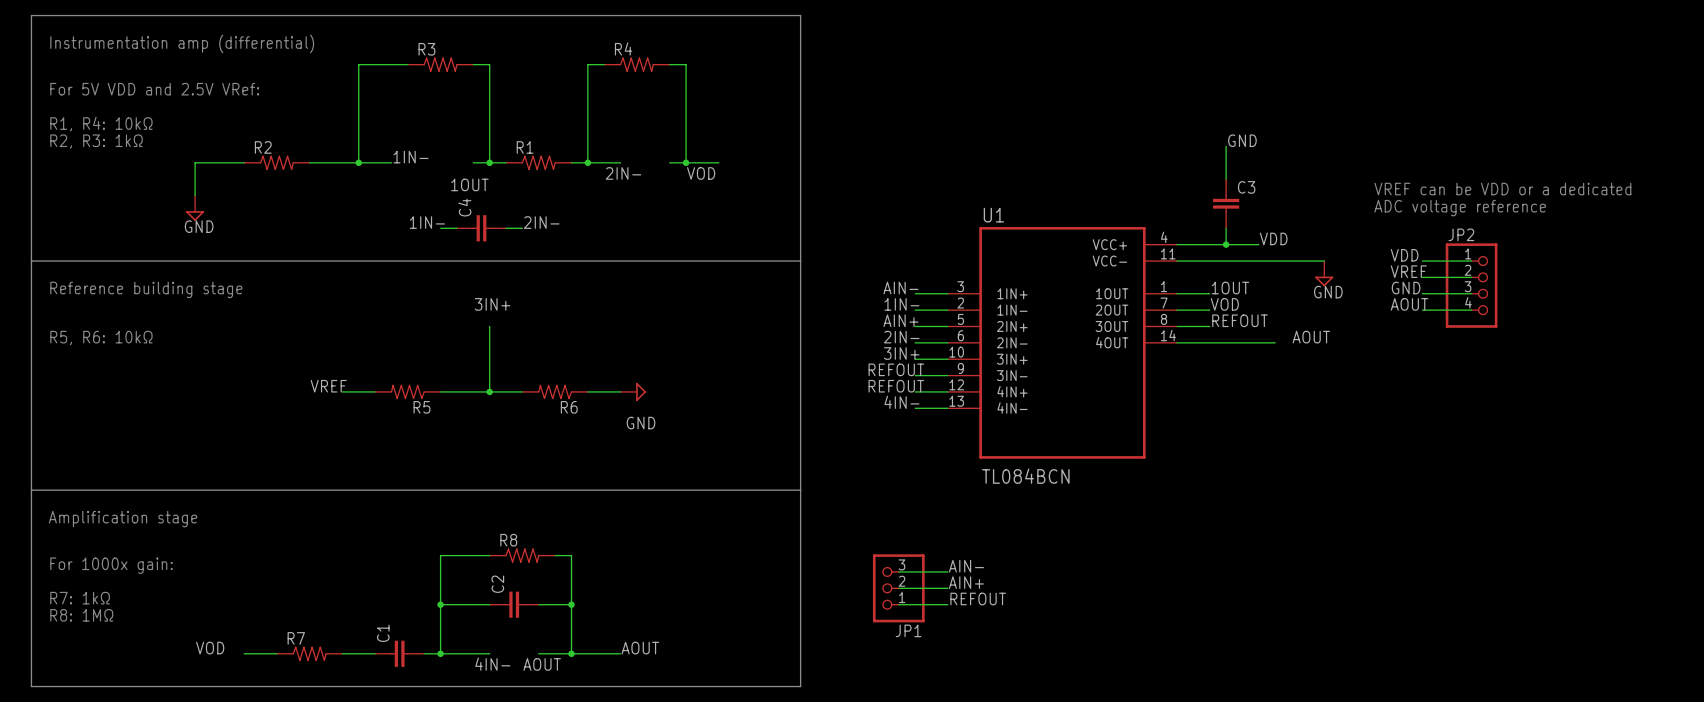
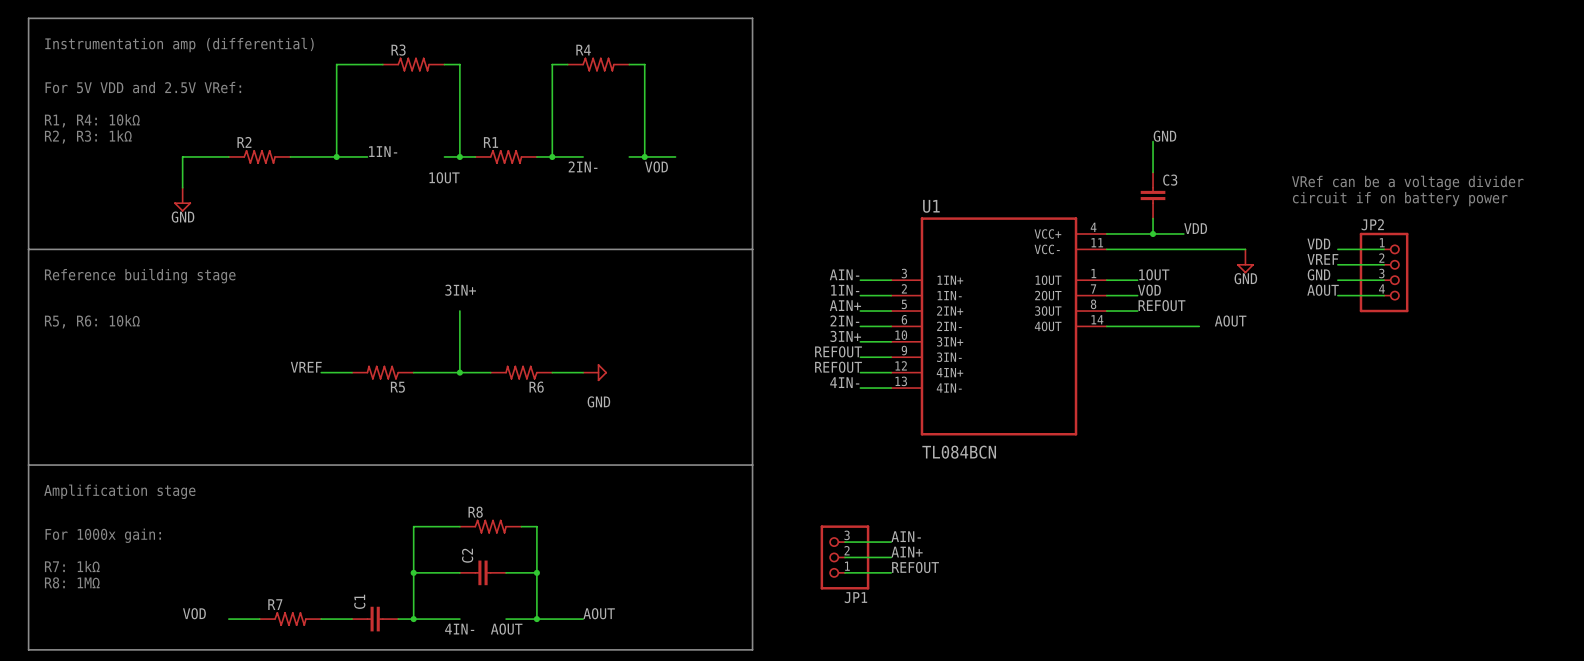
text: VREF can be VDD or a dedicated (1502, 189) -> VRef can be a voltage divider (1407, 182)
text: ADC voltage reference (1460, 208) -> circuit if on battery power (1400, 199)
label: 1IN- (427, 222) -> none
label: 2IN- (541, 222) -> none
wire: (440, 228) (456, 228) -> none
C4: (481, 228) -> none
wire: (506, 228) (522, 228) -> none

